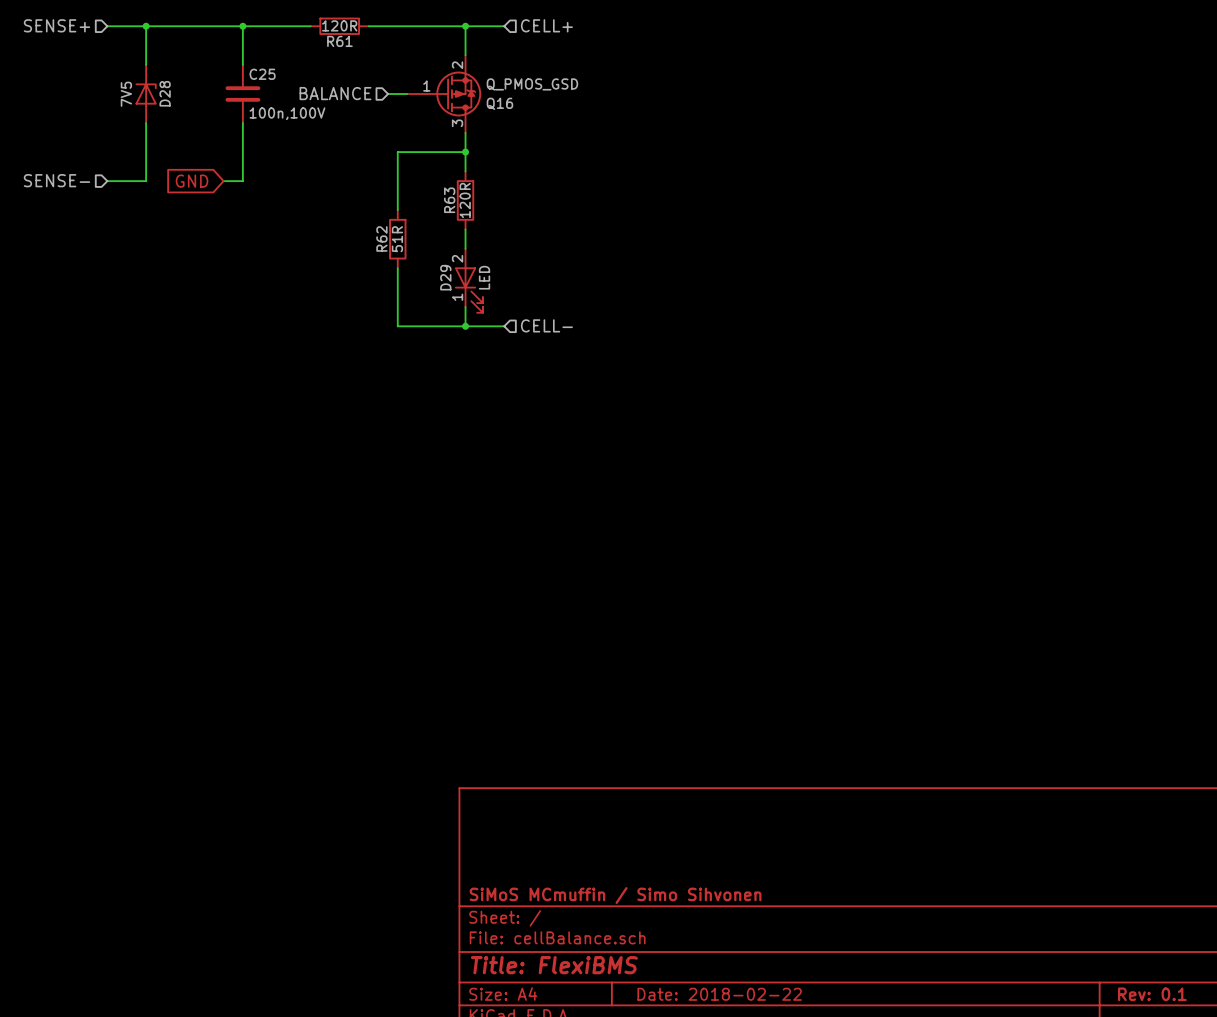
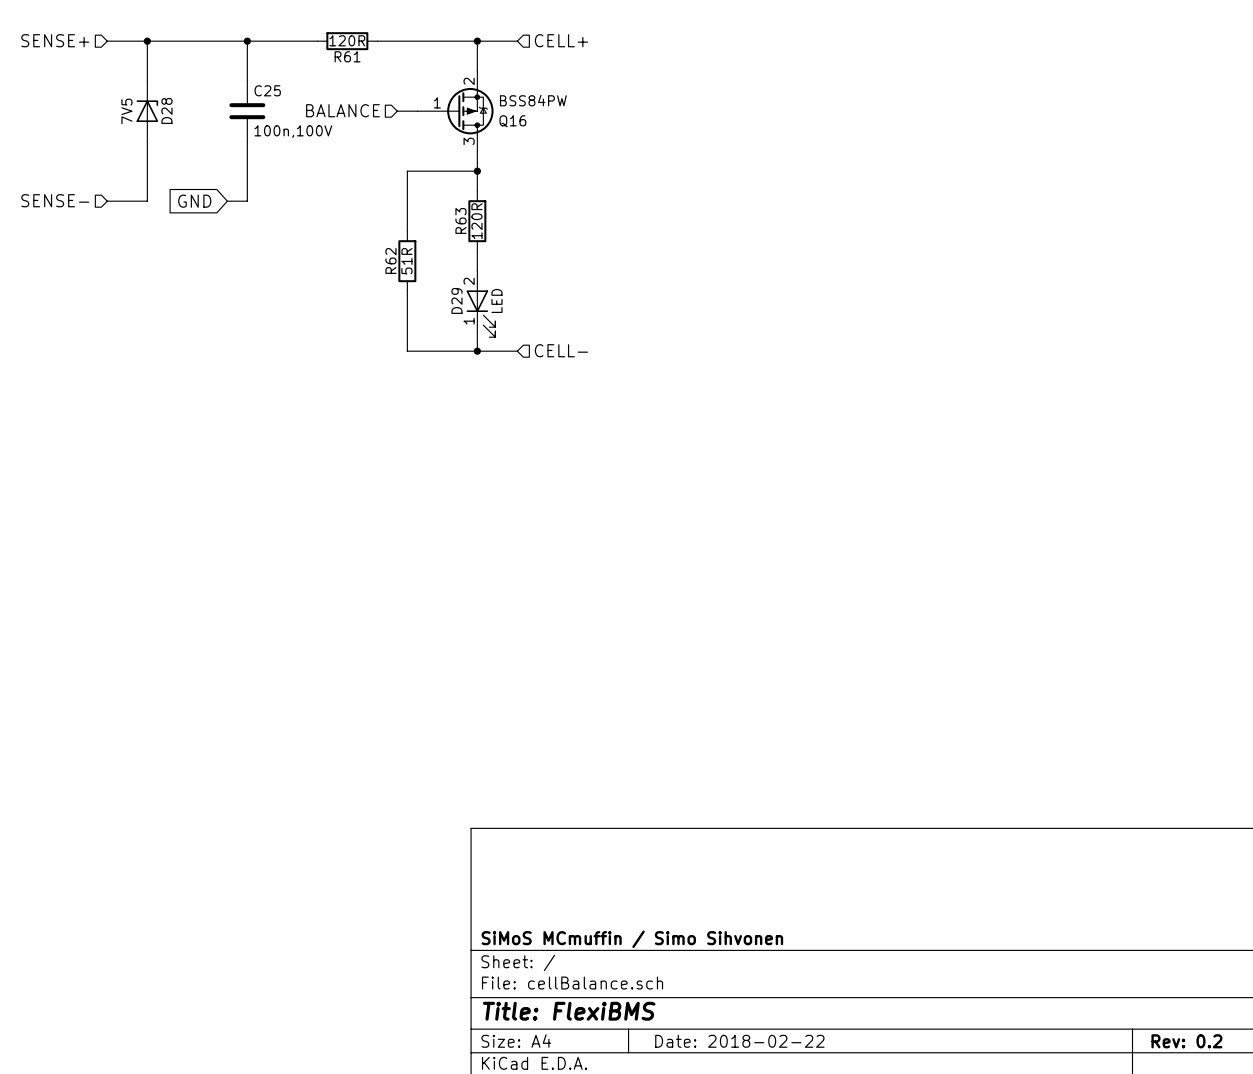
Q16 value: Q_PMOS_GSD (532, 84) -> BSS84PW (533, 100)
title block: Rev: 0.1 (1152, 994) -> Rev: 0.2 (1186, 1041)

